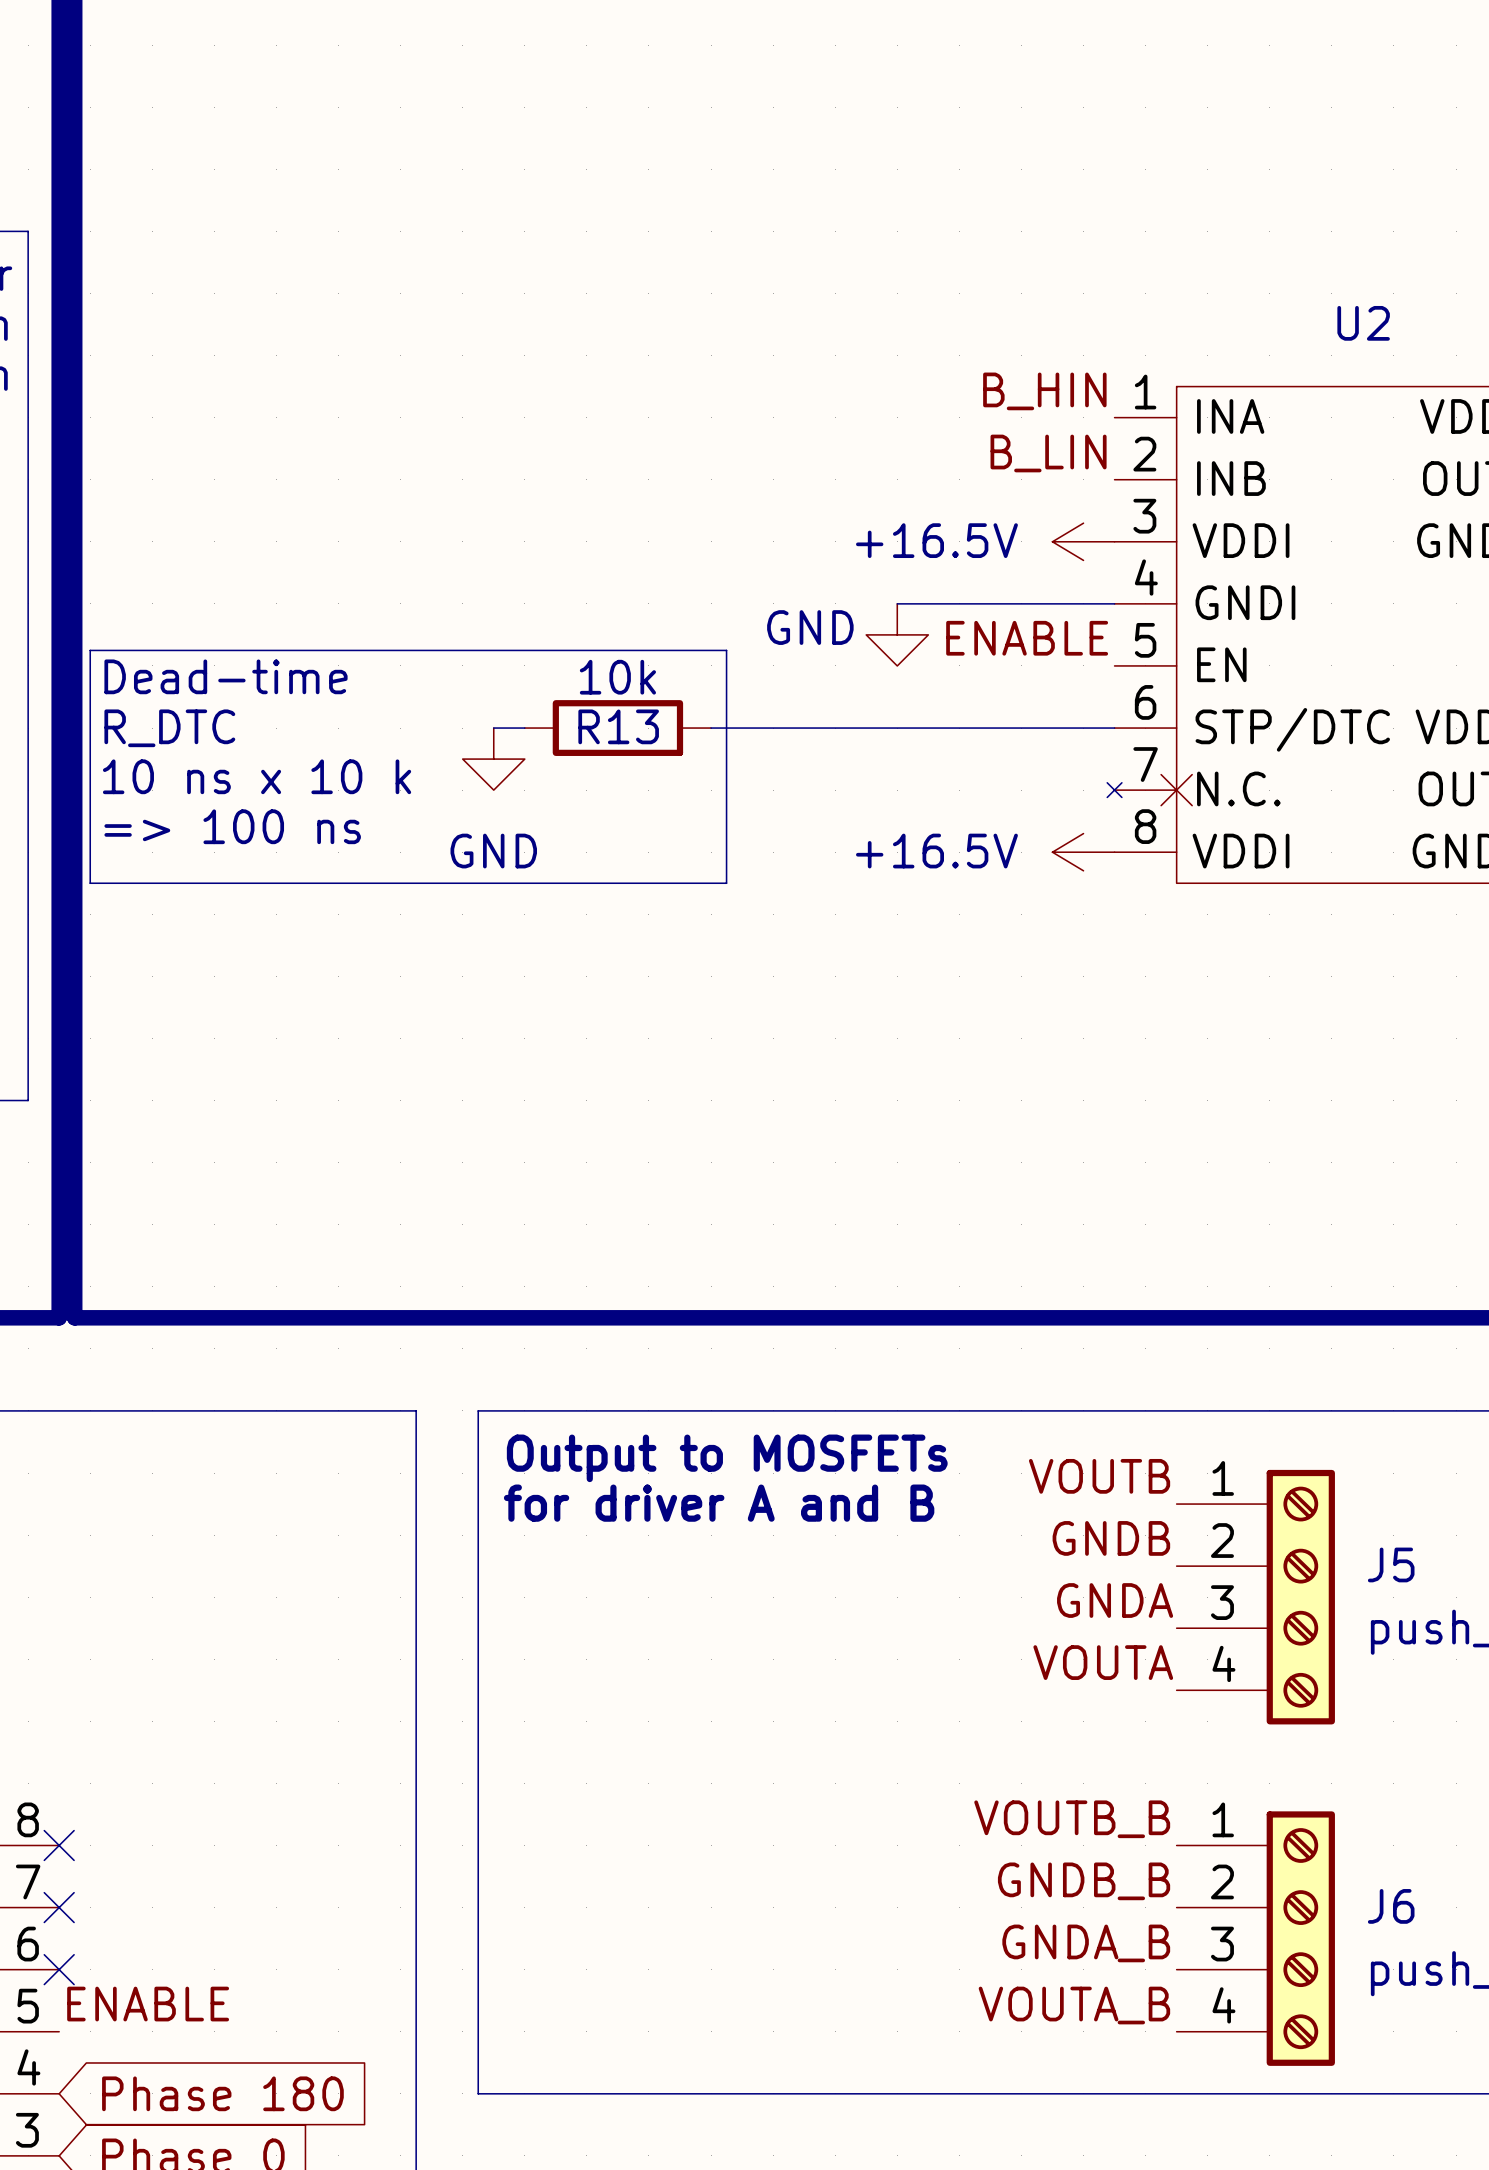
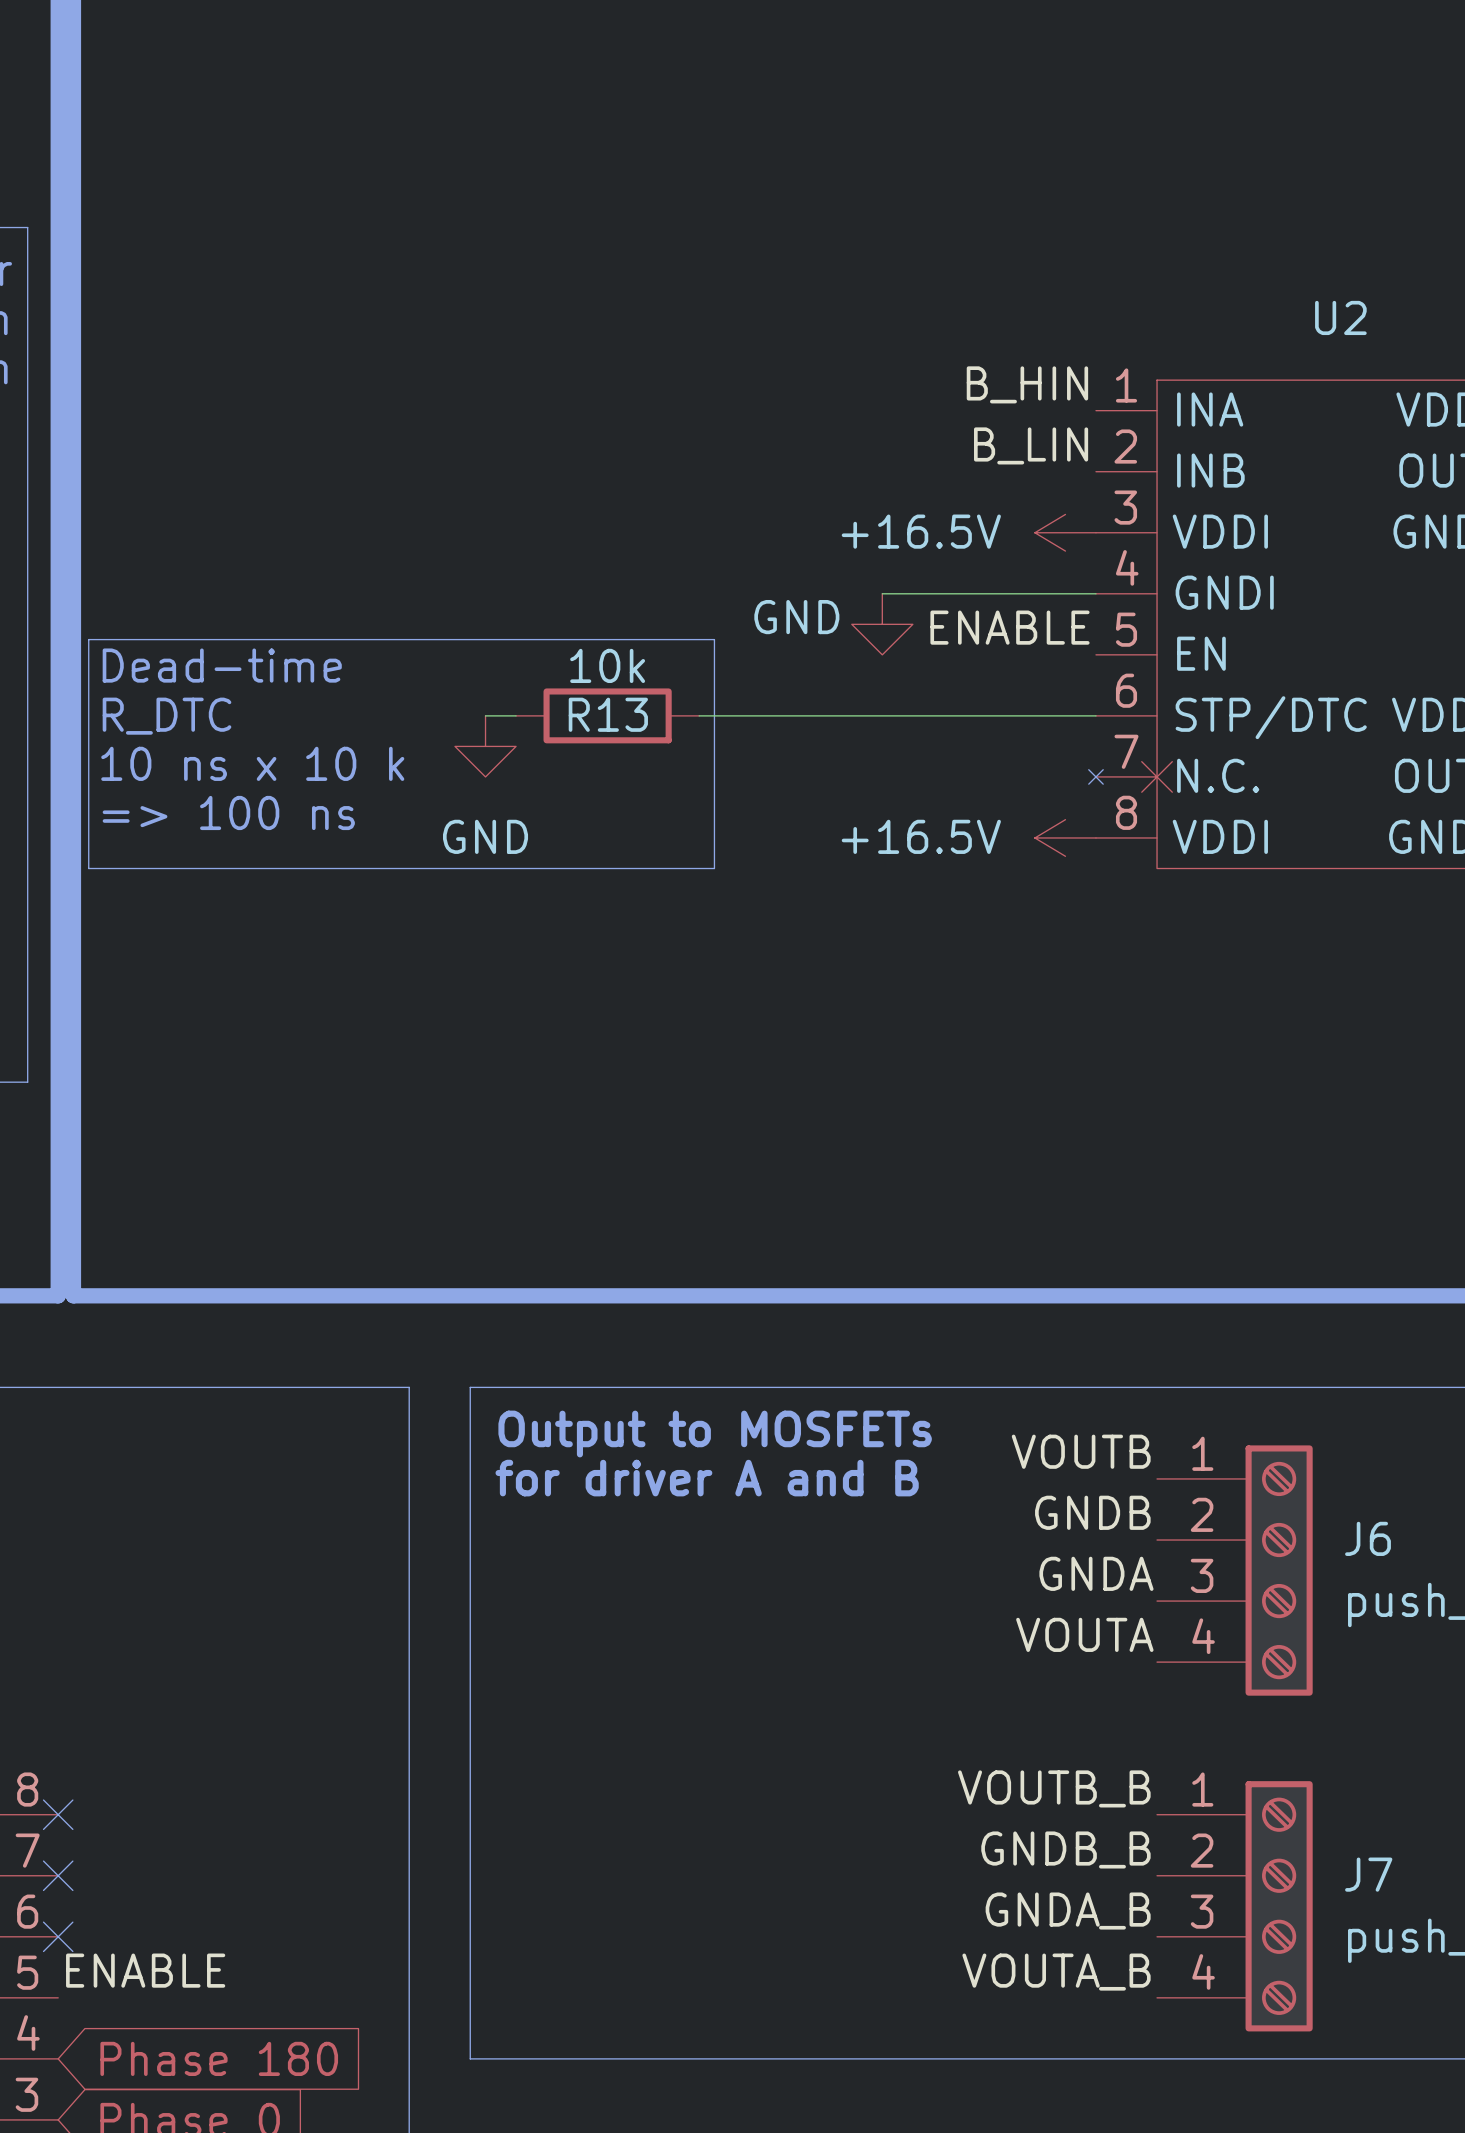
J5 name: J5 (1391, 1564) -> J6 (1368, 1538)
J6 name: J6 (1391, 1906) -> J7 (1368, 1874)

